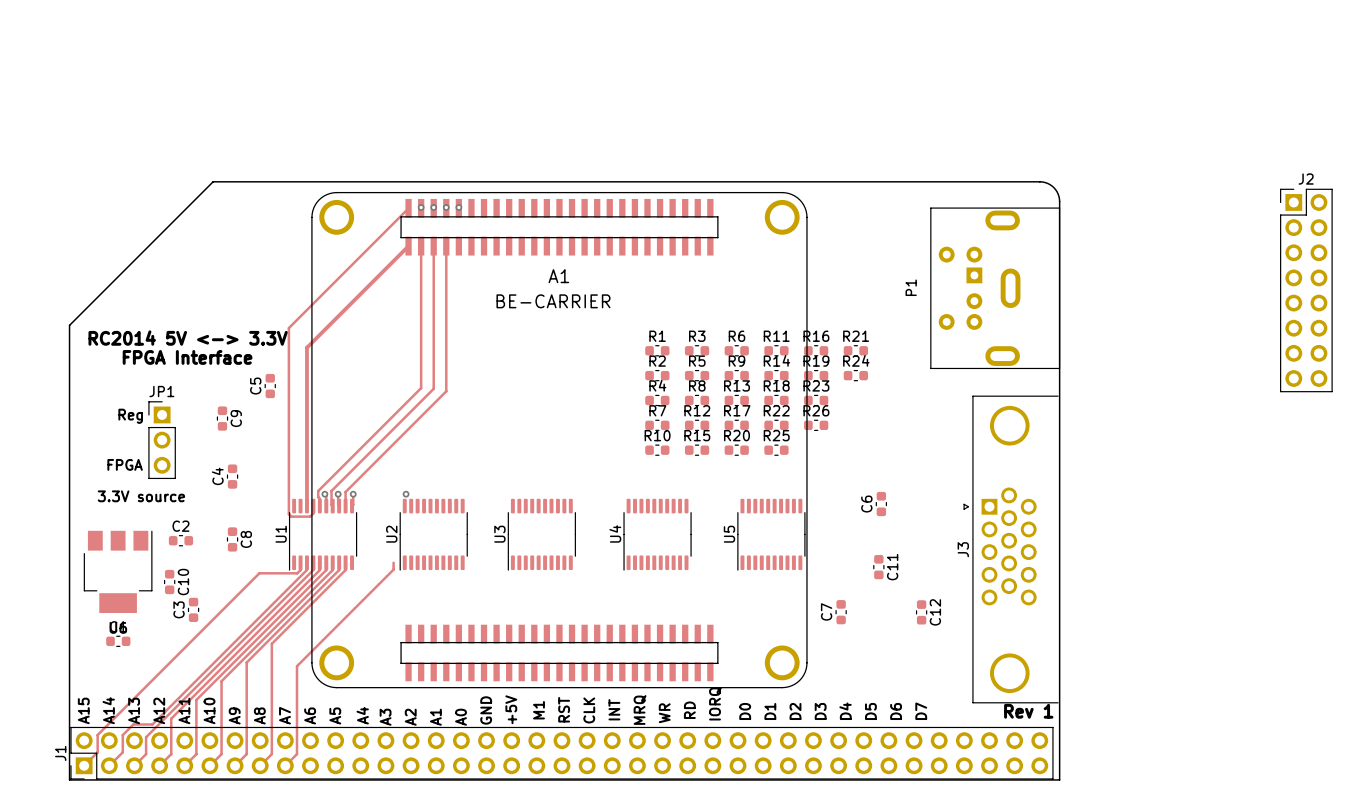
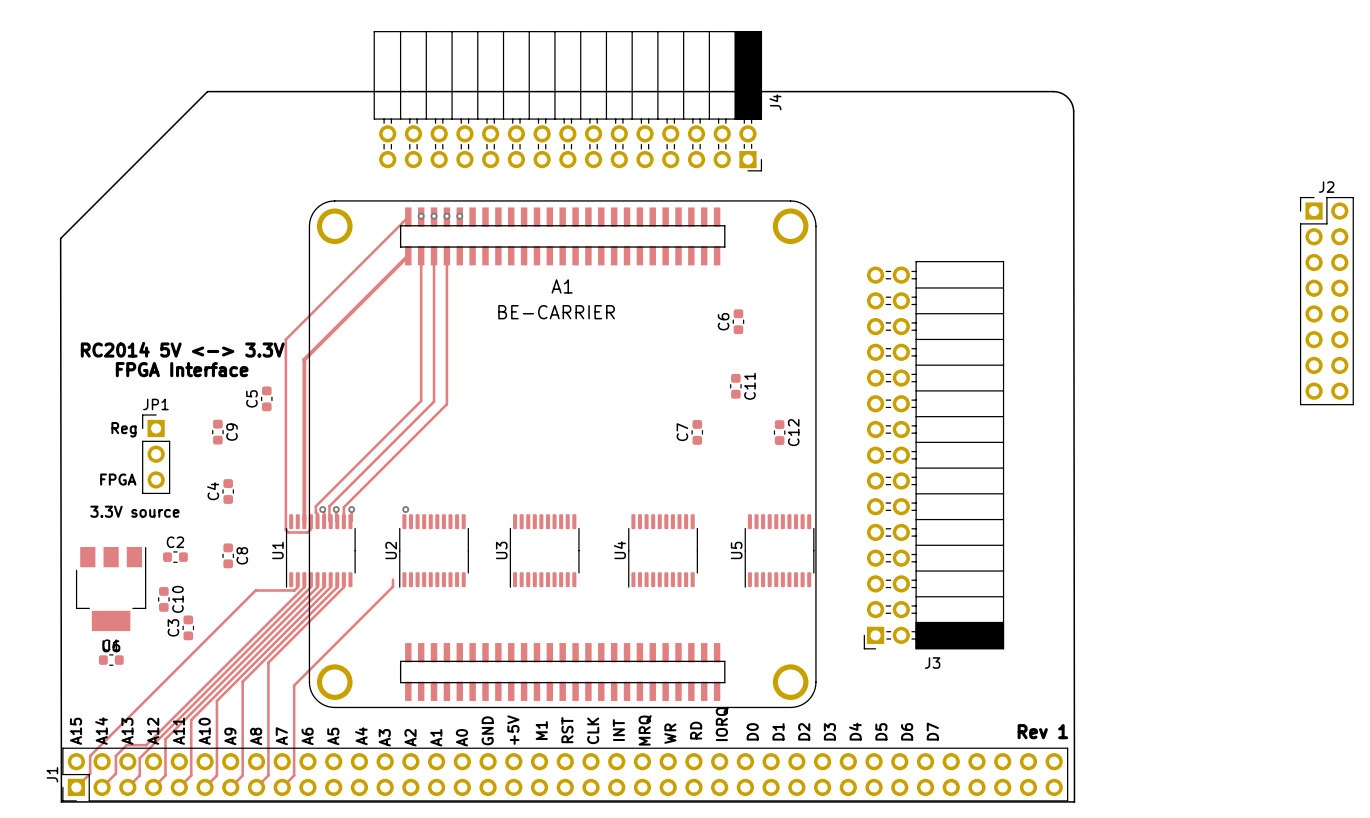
J4: none -> (567, 101)
P1: (995, 288) -> none
R1: (657, 350) -> none
R3: (697, 350) -> none
R6: (736, 350) -> none
R11: (776, 350) -> none
R16: (816, 350) -> none
R21: (855, 350) -> none
R2: (657, 375) -> none
R5: (697, 375) -> none
R9: (736, 375) -> none
R14: (776, 375) -> none
R19: (816, 375) -> none
R24: (855, 375) -> none
J3 footprint: [963, 395, 1059, 704] -> [863, 261, 1005, 650]
R4: (657, 400) -> none
R8: (697, 400) -> none
R13: (736, 400) -> none
R18: (776, 400) -> none
R23: (816, 400) -> none
R7: (657, 425) -> none
R12: (697, 425) -> none
R17: (736, 425) -> none
R22: (776, 425) -> none
R26: (816, 425) -> none
R10: (657, 450) -> none
R15: (697, 450) -> none
R20: (736, 450) -> none
R25: (776, 450) -> none
C6 position: (881, 504) -> (738, 321)
J3 name position: J3 (963, 549) -> J3 (932, 663)
C11 position: (878, 567) -> (735, 386)
C7 position: (841, 612) -> (697, 432)
C12 position: (921, 612) -> (779, 432)
board edge: (69, 779) (69, 325) (213, 181) (1039, 181) (1051, 185) (1058, 194) (1059, 201) (1059, 779) -> (61, 801) (60, 238) (207, 91) (1053, 91) (1065, 95) (1072, 104) (1073, 111) (1074, 801)

